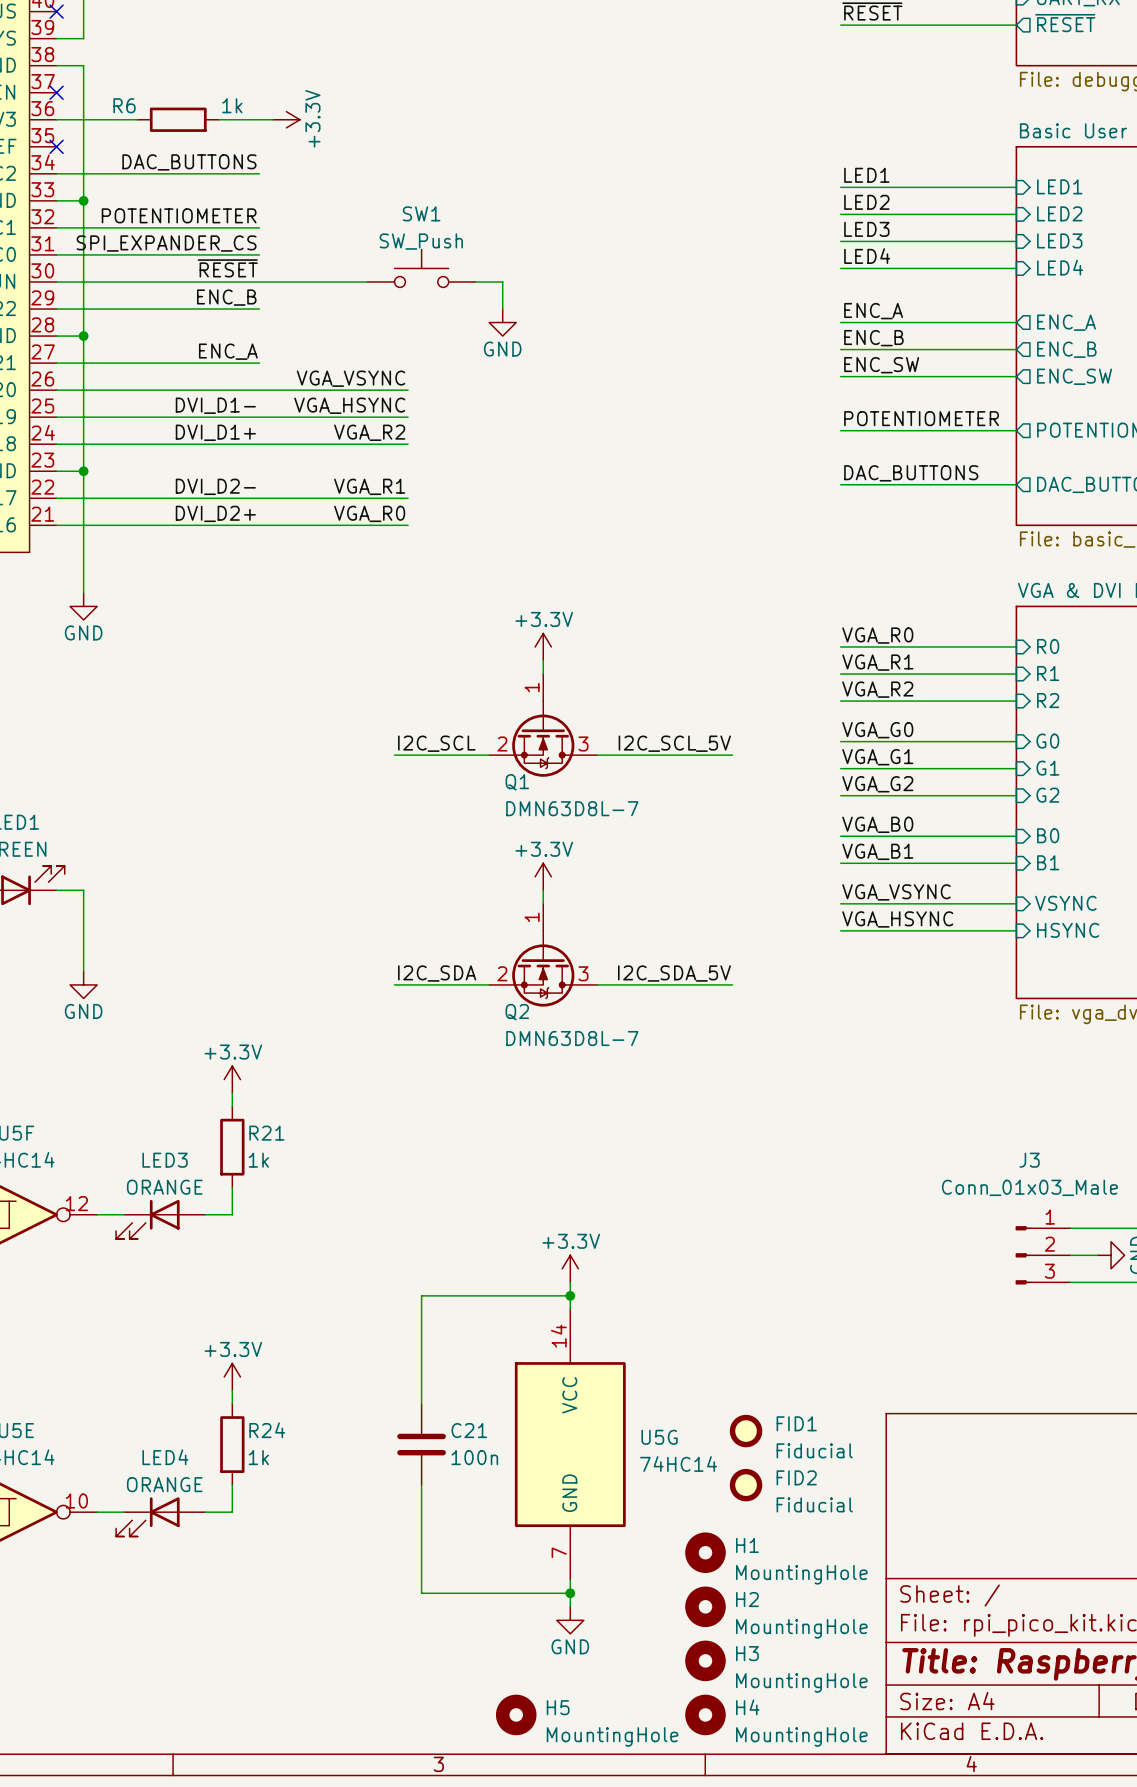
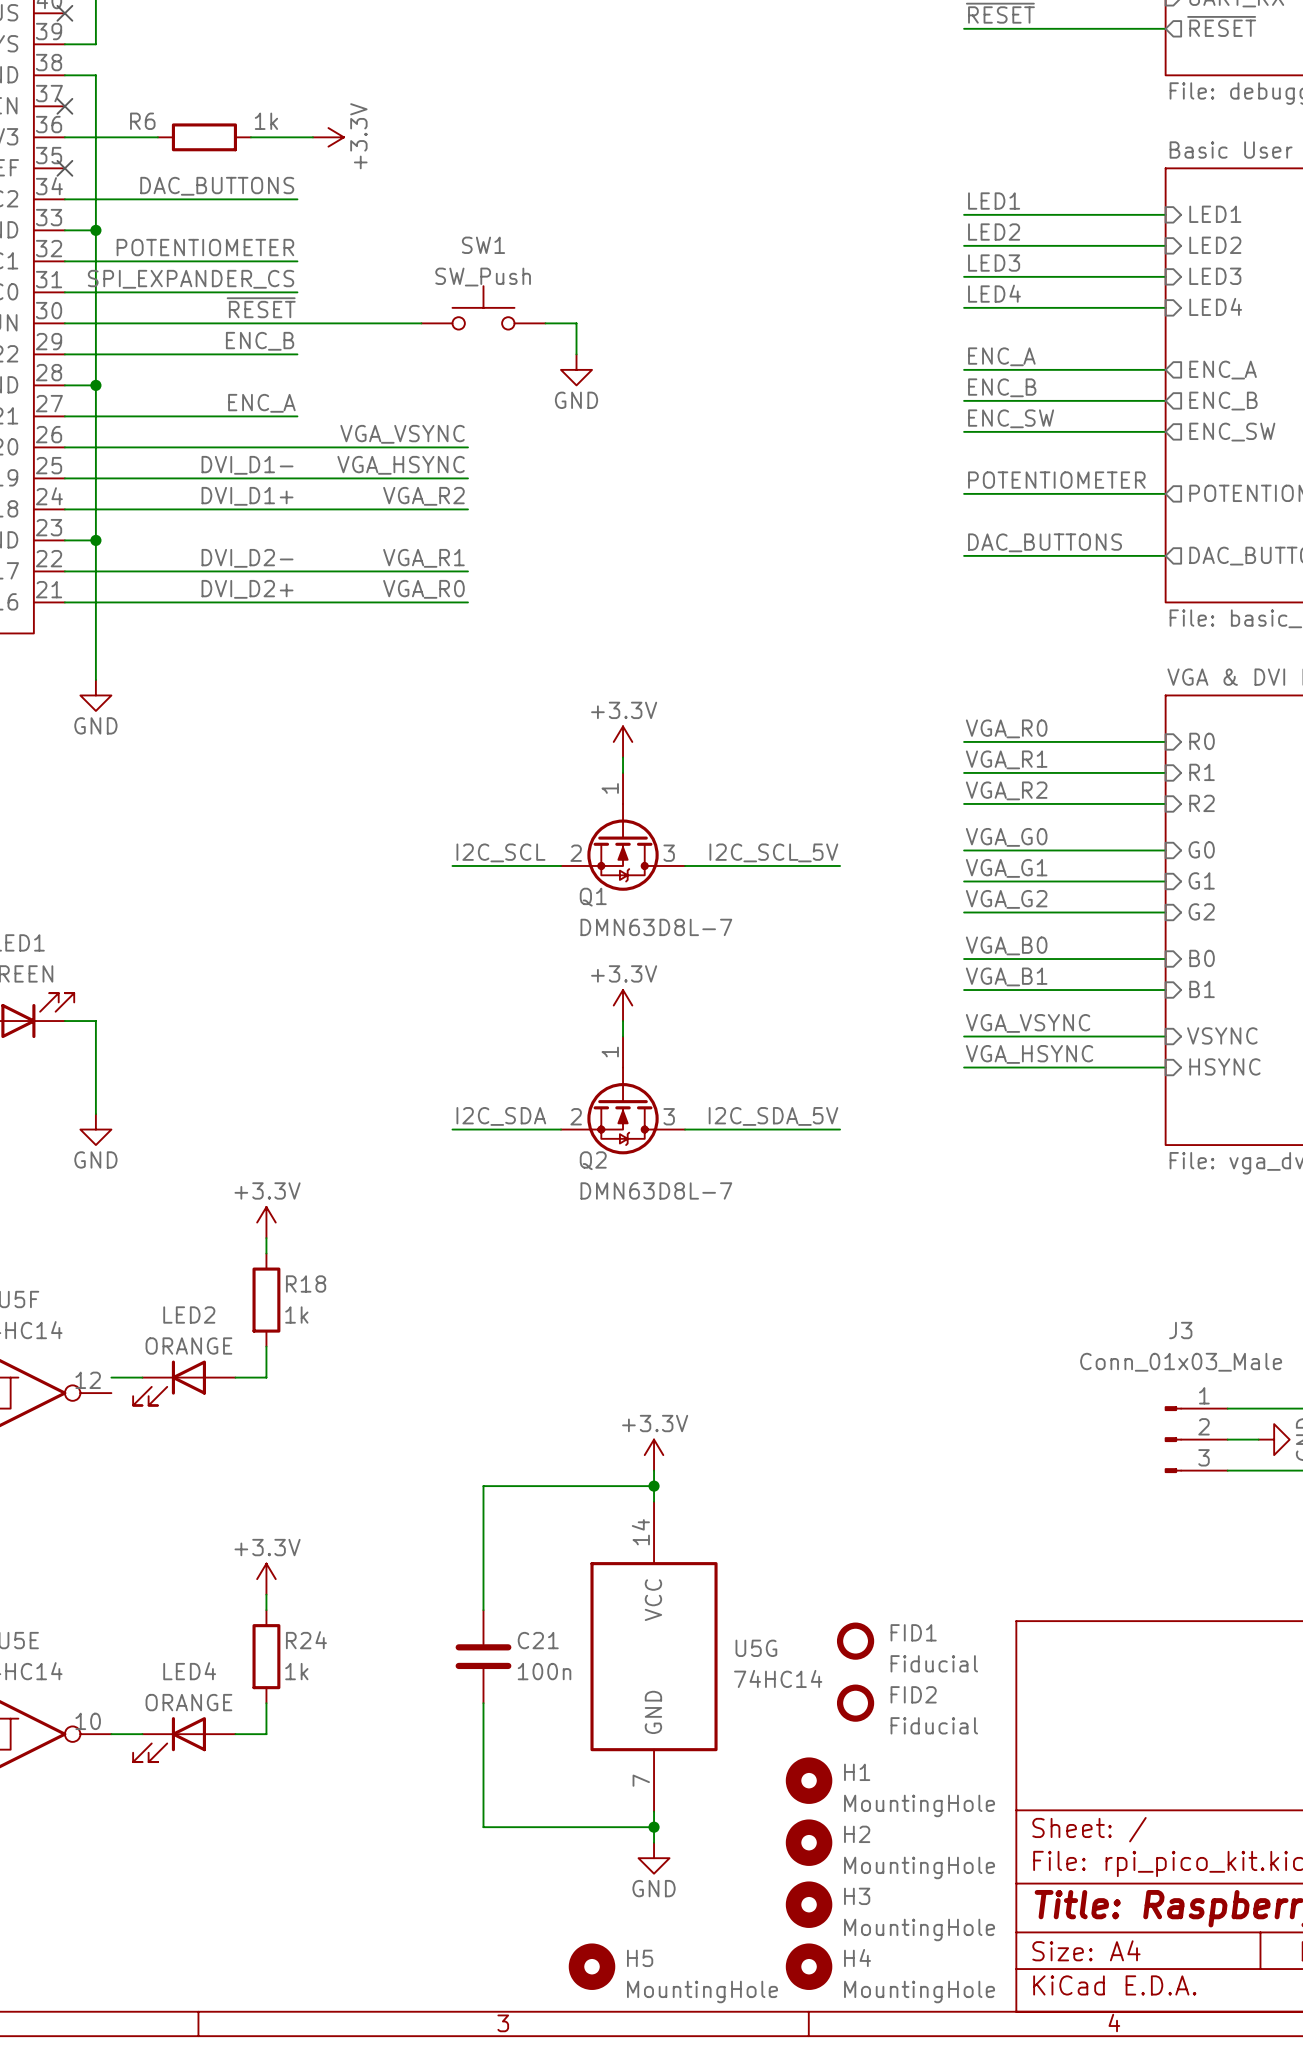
power symbol position: +3.3V (232, 1079) -> +3.3V (266, 1222)
R18: none -> 1k (266, 1300)
R21: 1k (232, 1147) -> none
wire: (232, 1201) (232, 1214) (205, 1214) -> (266, 1377) (235, 1377)
LED2: none -> ORANGE (184, 1383)
wire: (97, 1214) (124, 1214) -> (111, 1377) (142, 1377)
LED3: ORANGE (160, 1219) -> none

